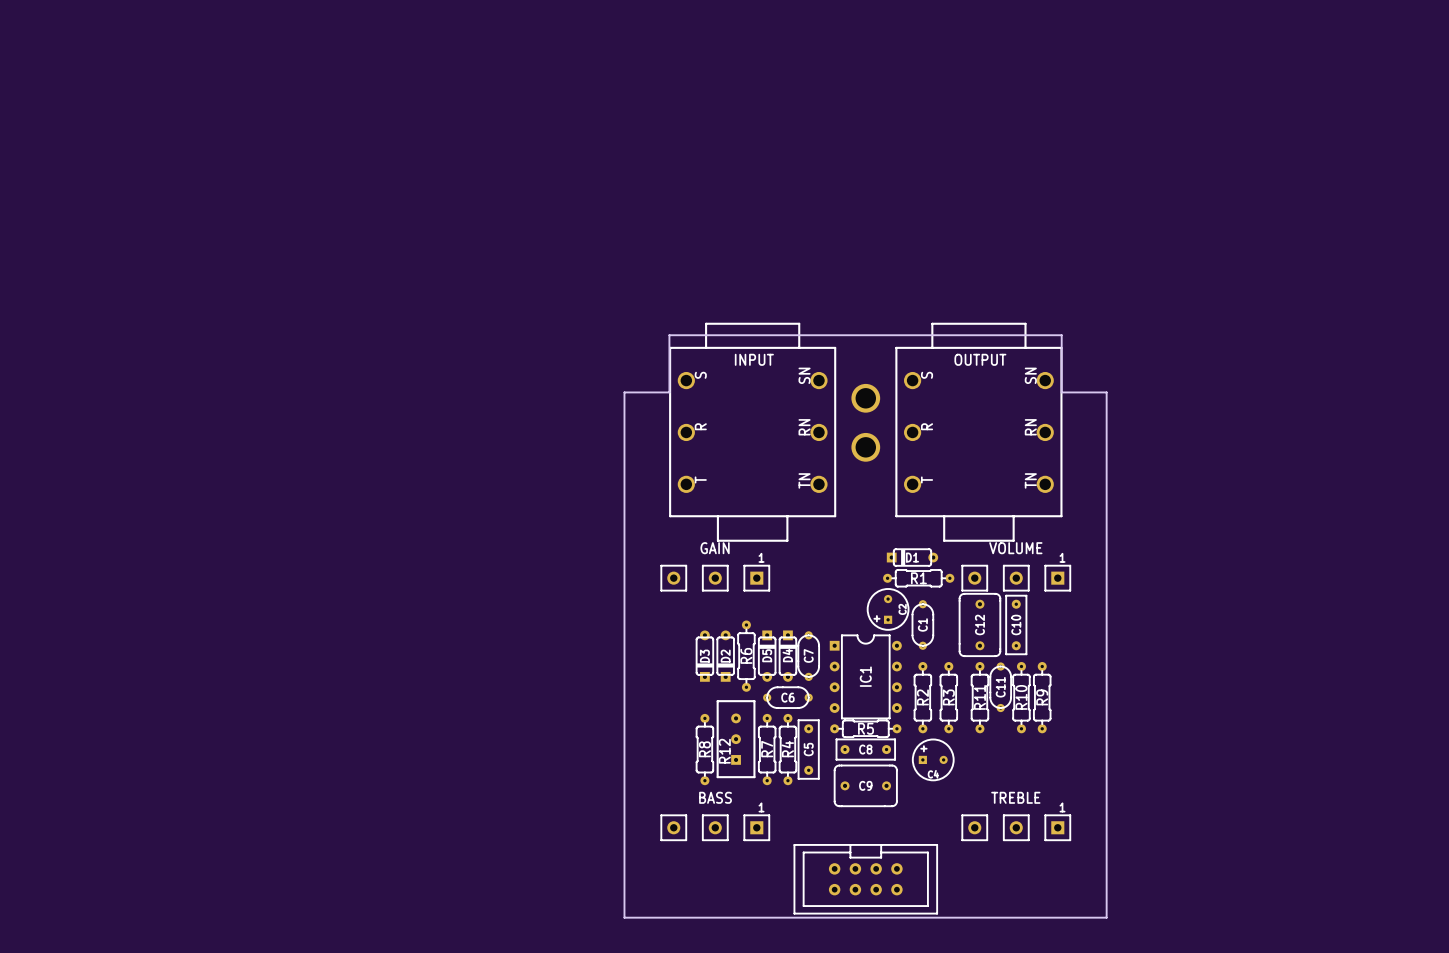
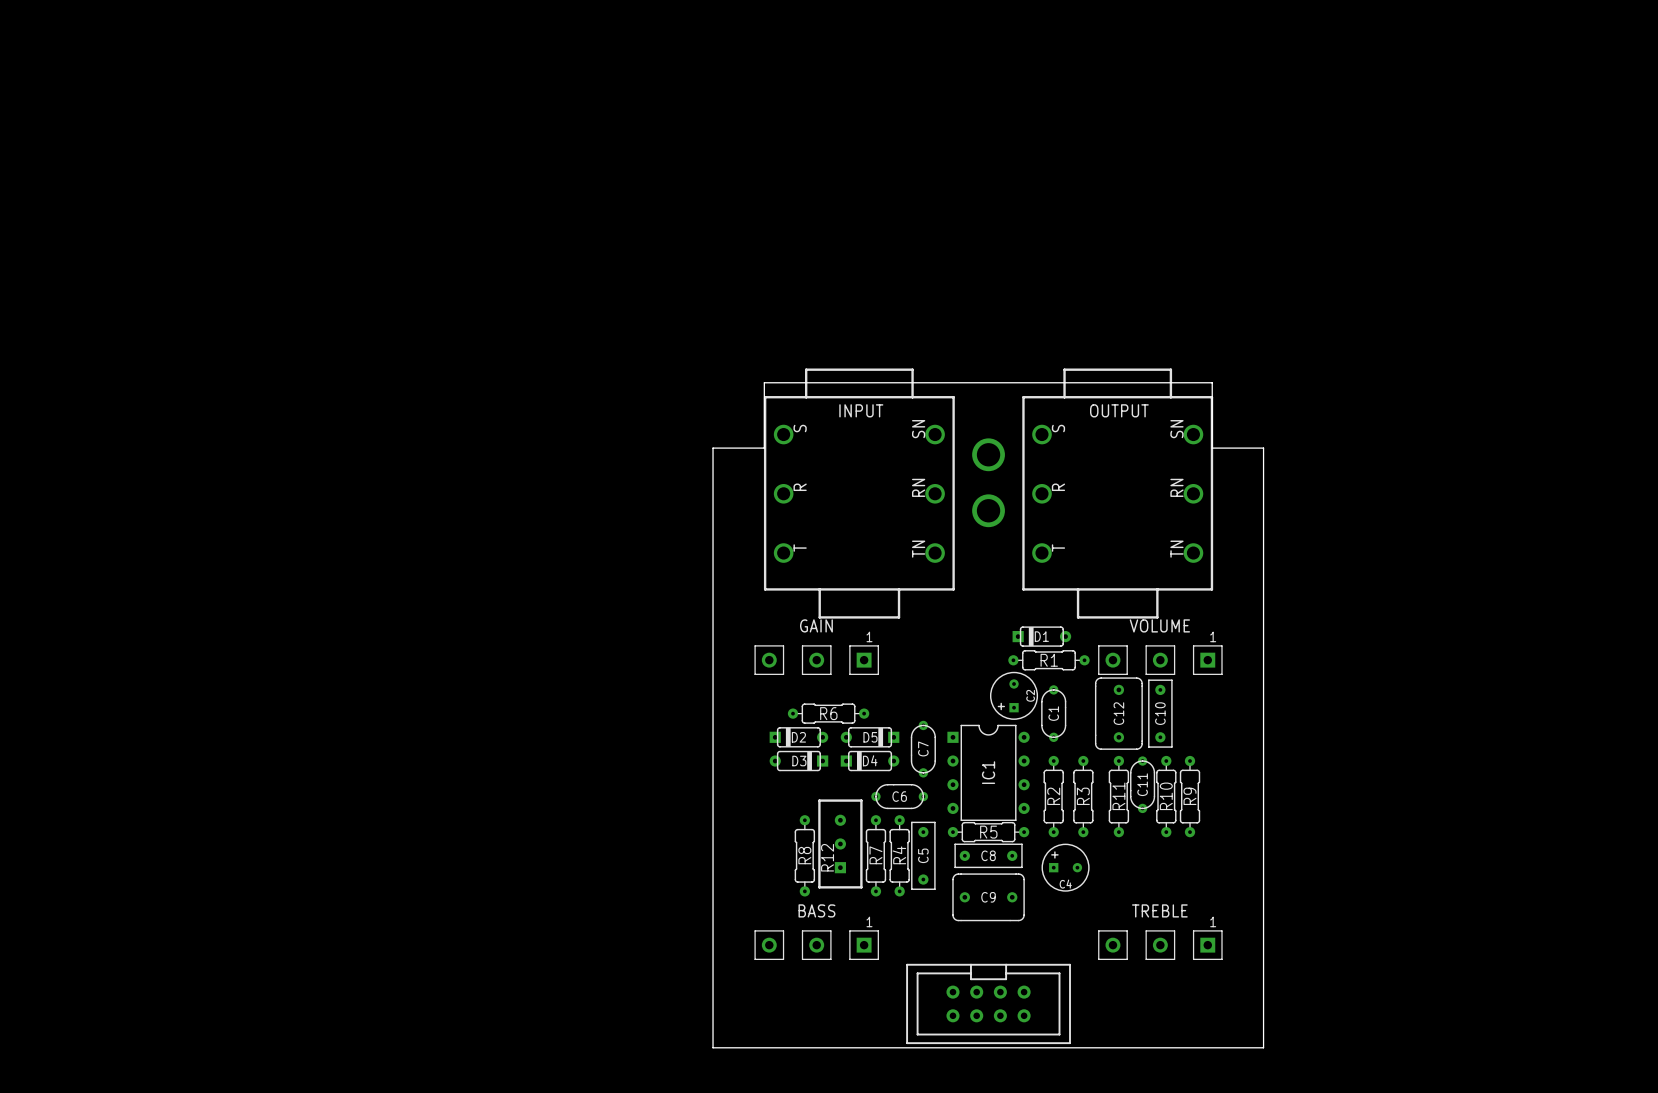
D3 rotation: 0° (704, 656) -> 90° counterclockwise (798, 761)
D2 rotation: 0° (725, 656) -> 90° clockwise (798, 737)
R6 rotation: 0° (746, 656) -> 90° clockwise (828, 713)
D5 rotation: 0° (767, 656) -> 90° clockwise (870, 737)
D4 rotation: 0° (787, 656) -> 90° counterclockwise (870, 761)

